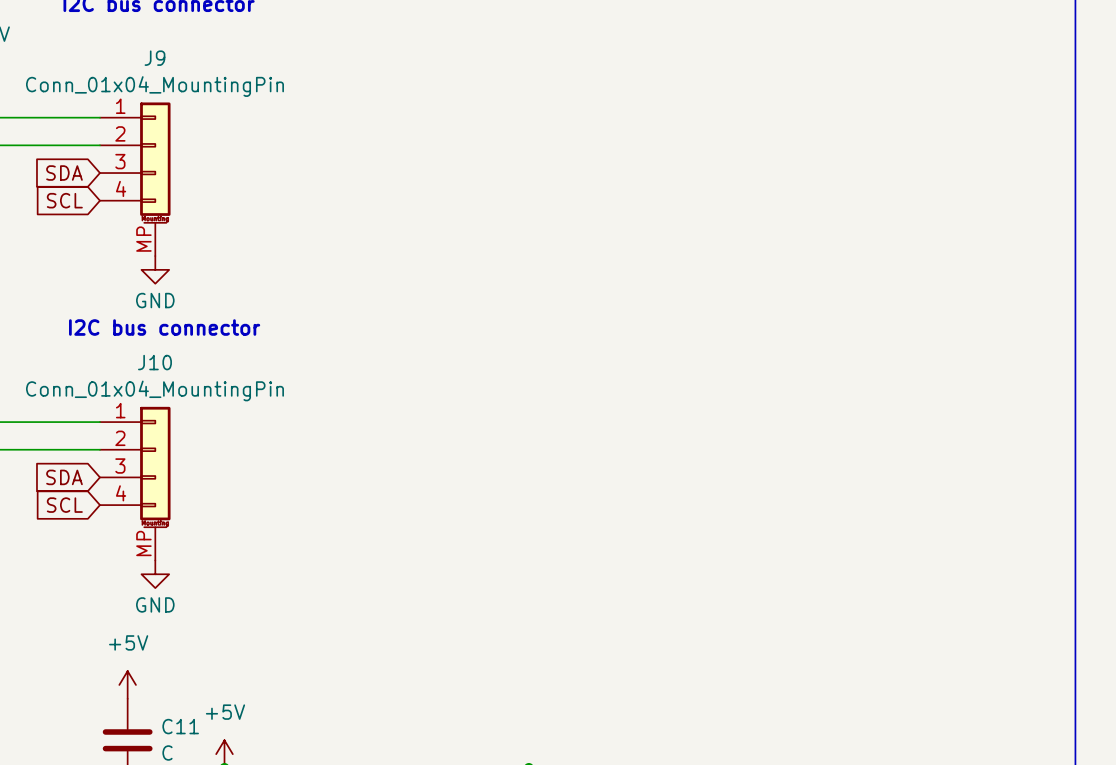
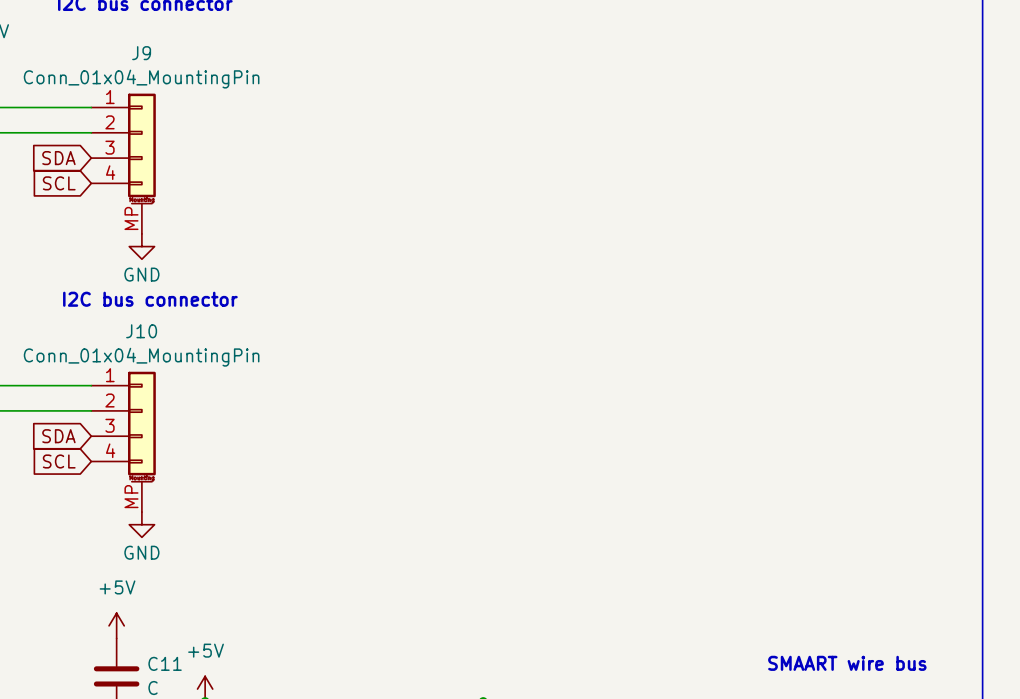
text: none -> SMAART wire bus (847, 663)

